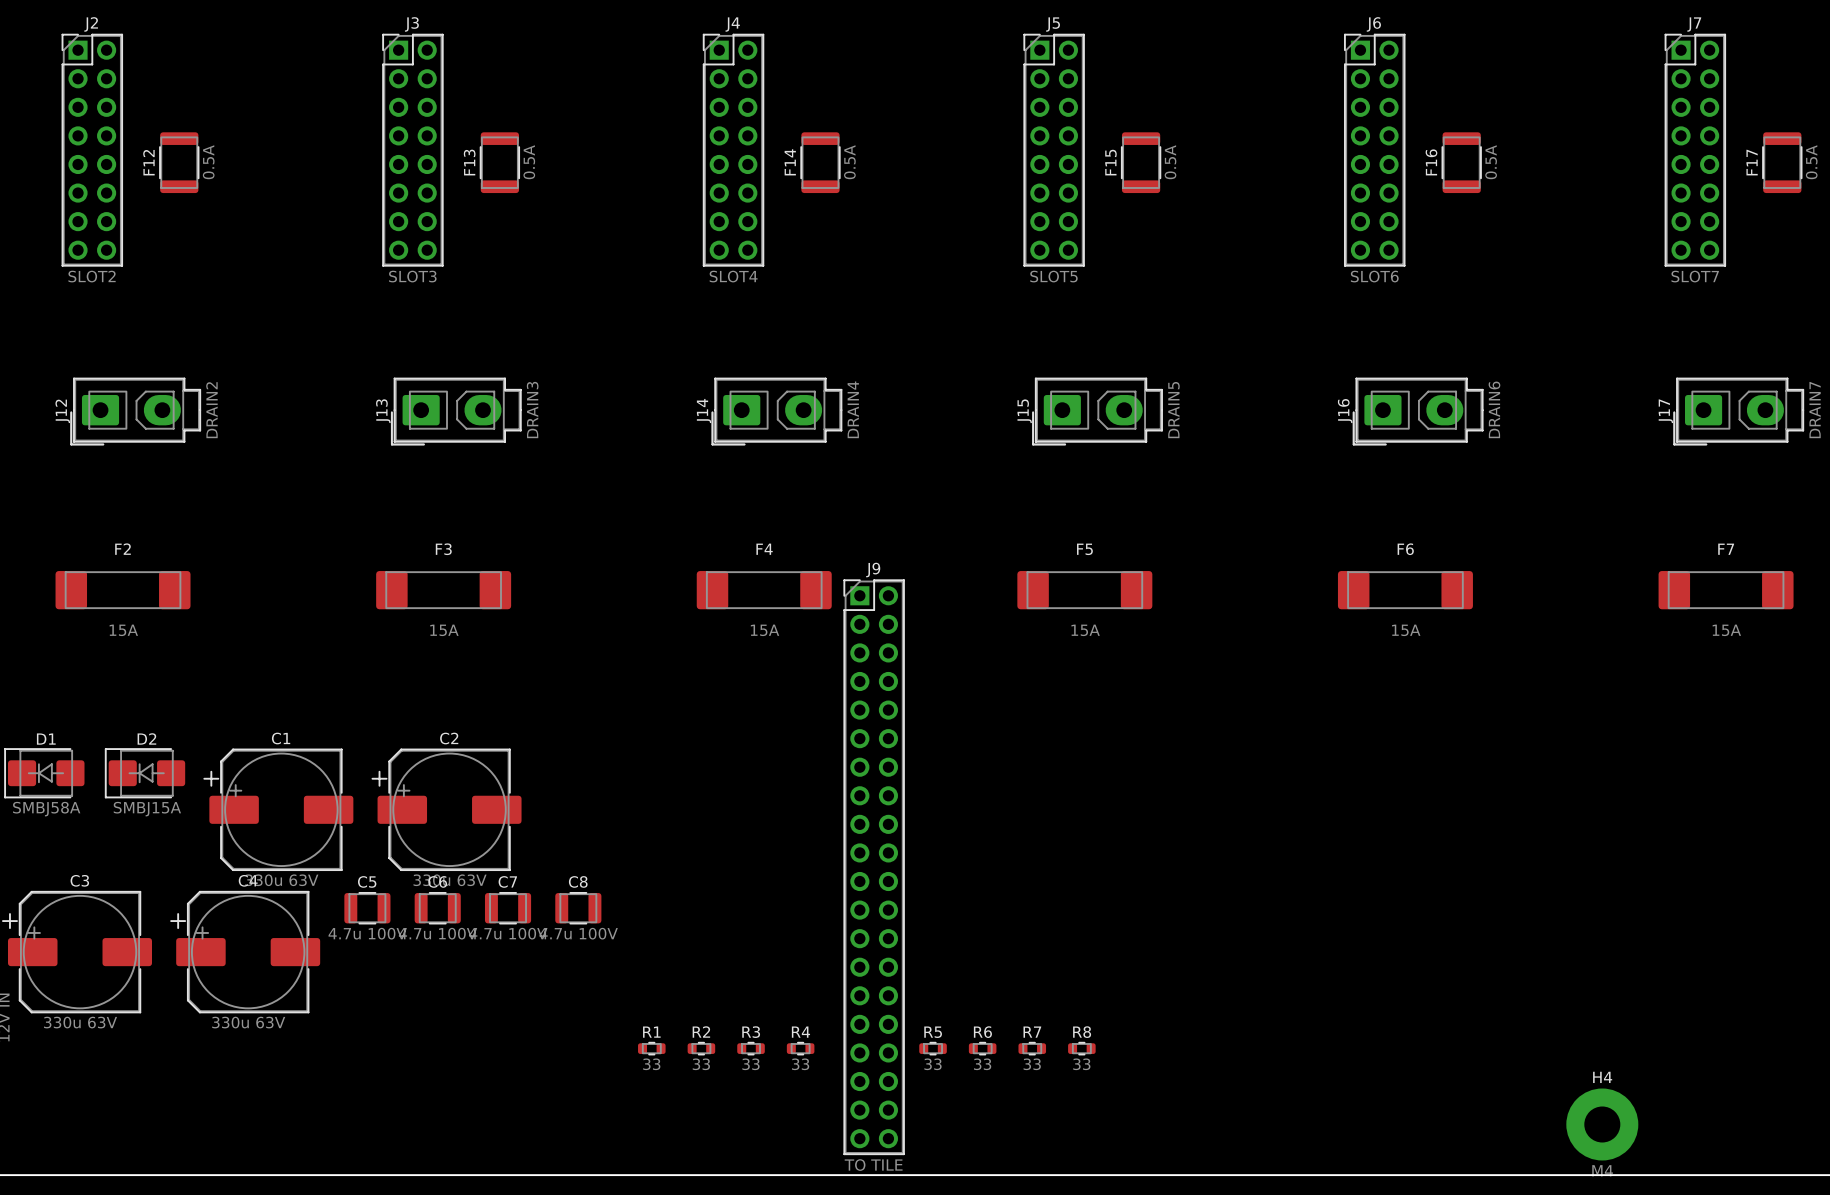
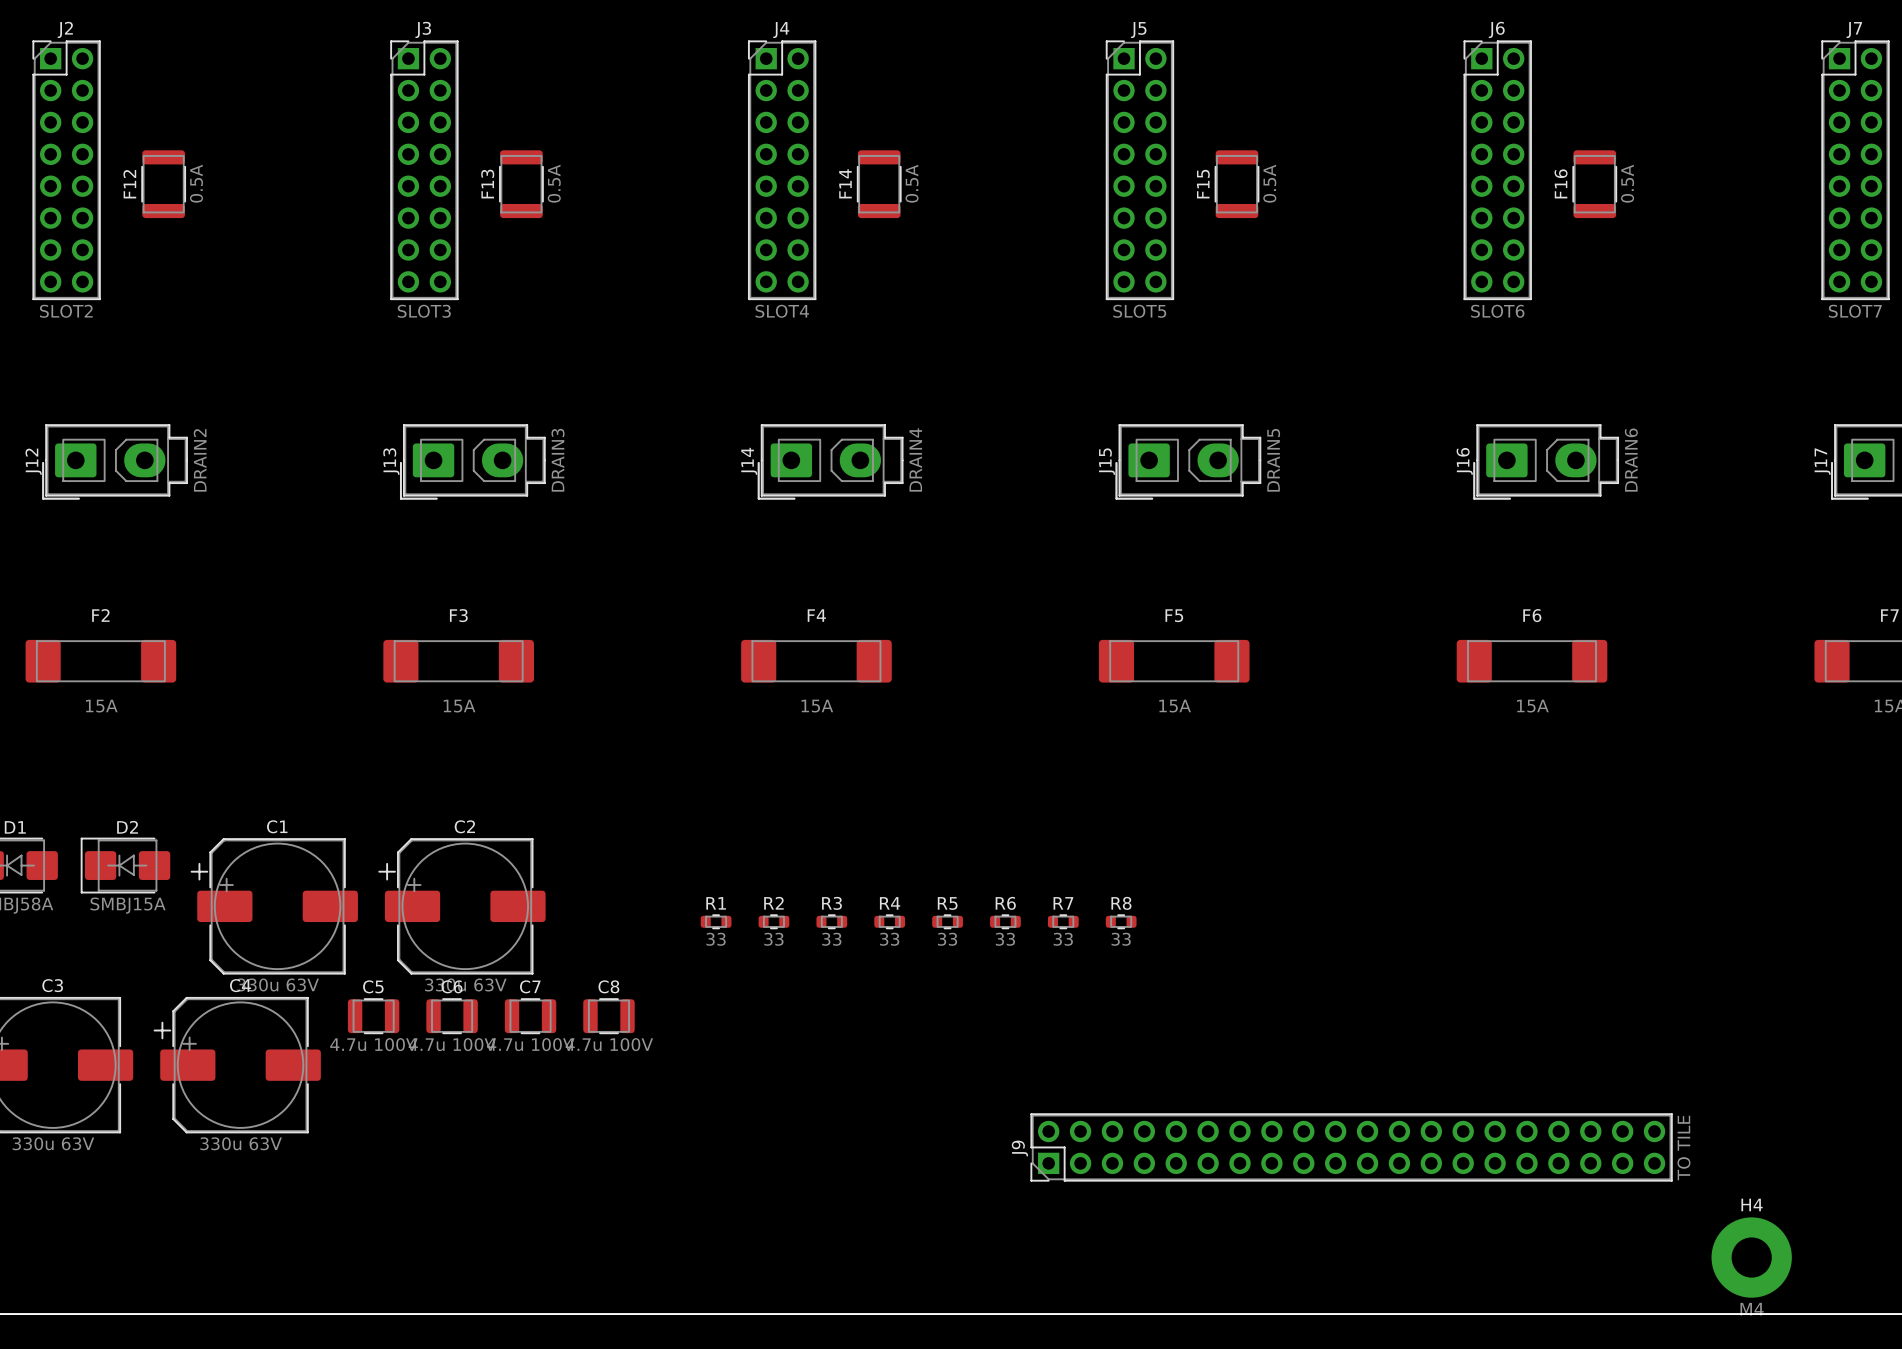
J9 rotation: 0° (874, 867) -> 90° counterclockwise (1351, 1147)
J9 position: (874, 867) -> (1351, 1147)
R1 position: (651, 1048) -> (716, 921)
R2 position: (701, 1048) -> (773, 921)
R3 position: (751, 1048) -> (831, 921)
R4 position: (800, 1048) -> (889, 921)
R5 position: (933, 1048) -> (947, 921)
R6 position: (982, 1048) -> (1005, 921)
R7 position: (1032, 1048) -> (1063, 921)
R8 position: (1081, 1048) -> (1121, 921)

